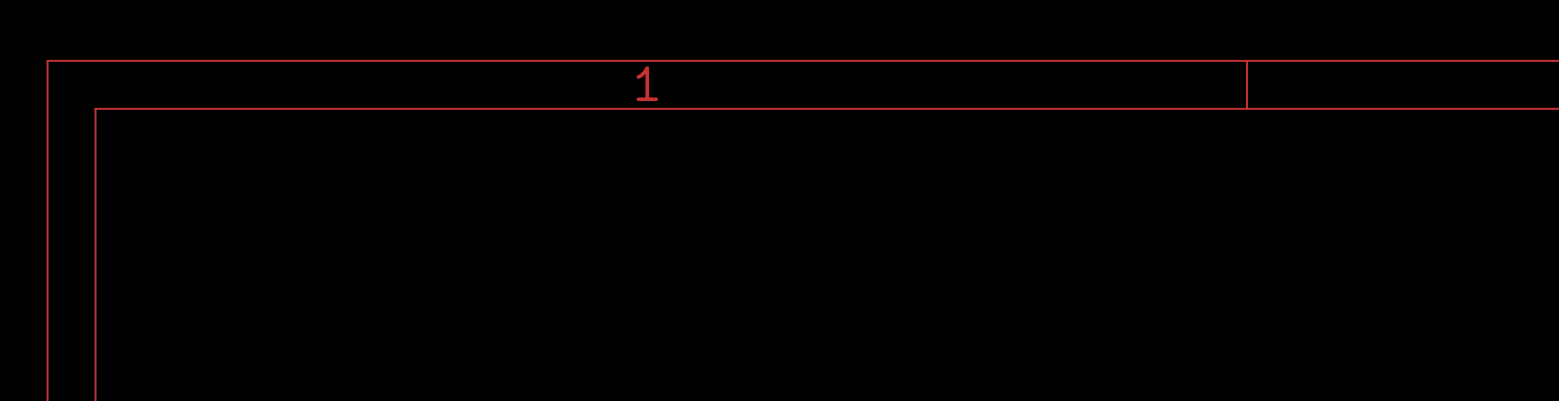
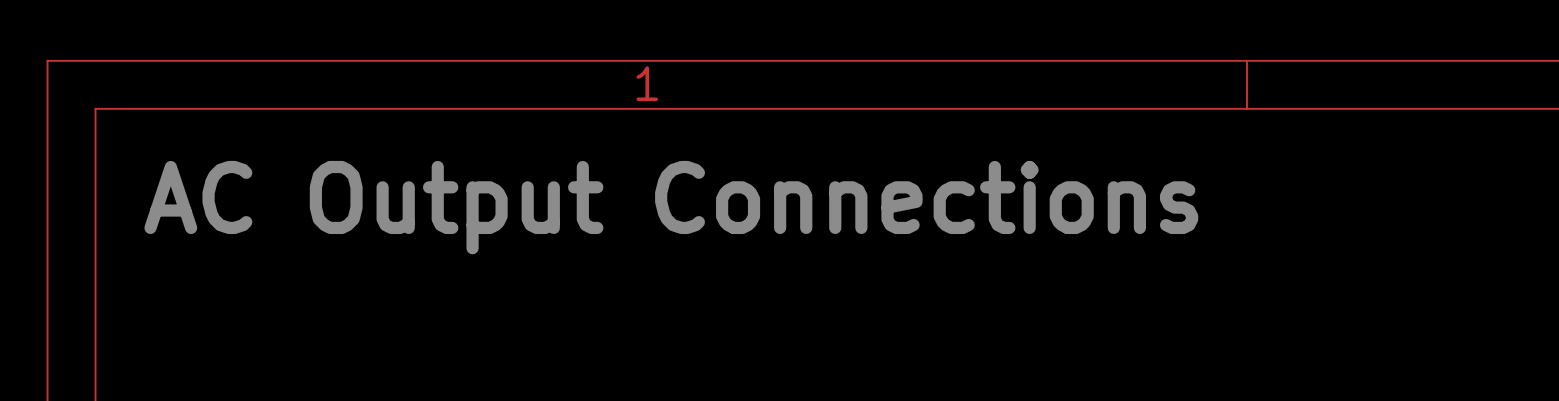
text: none -> AC Output Connections (671, 207)

